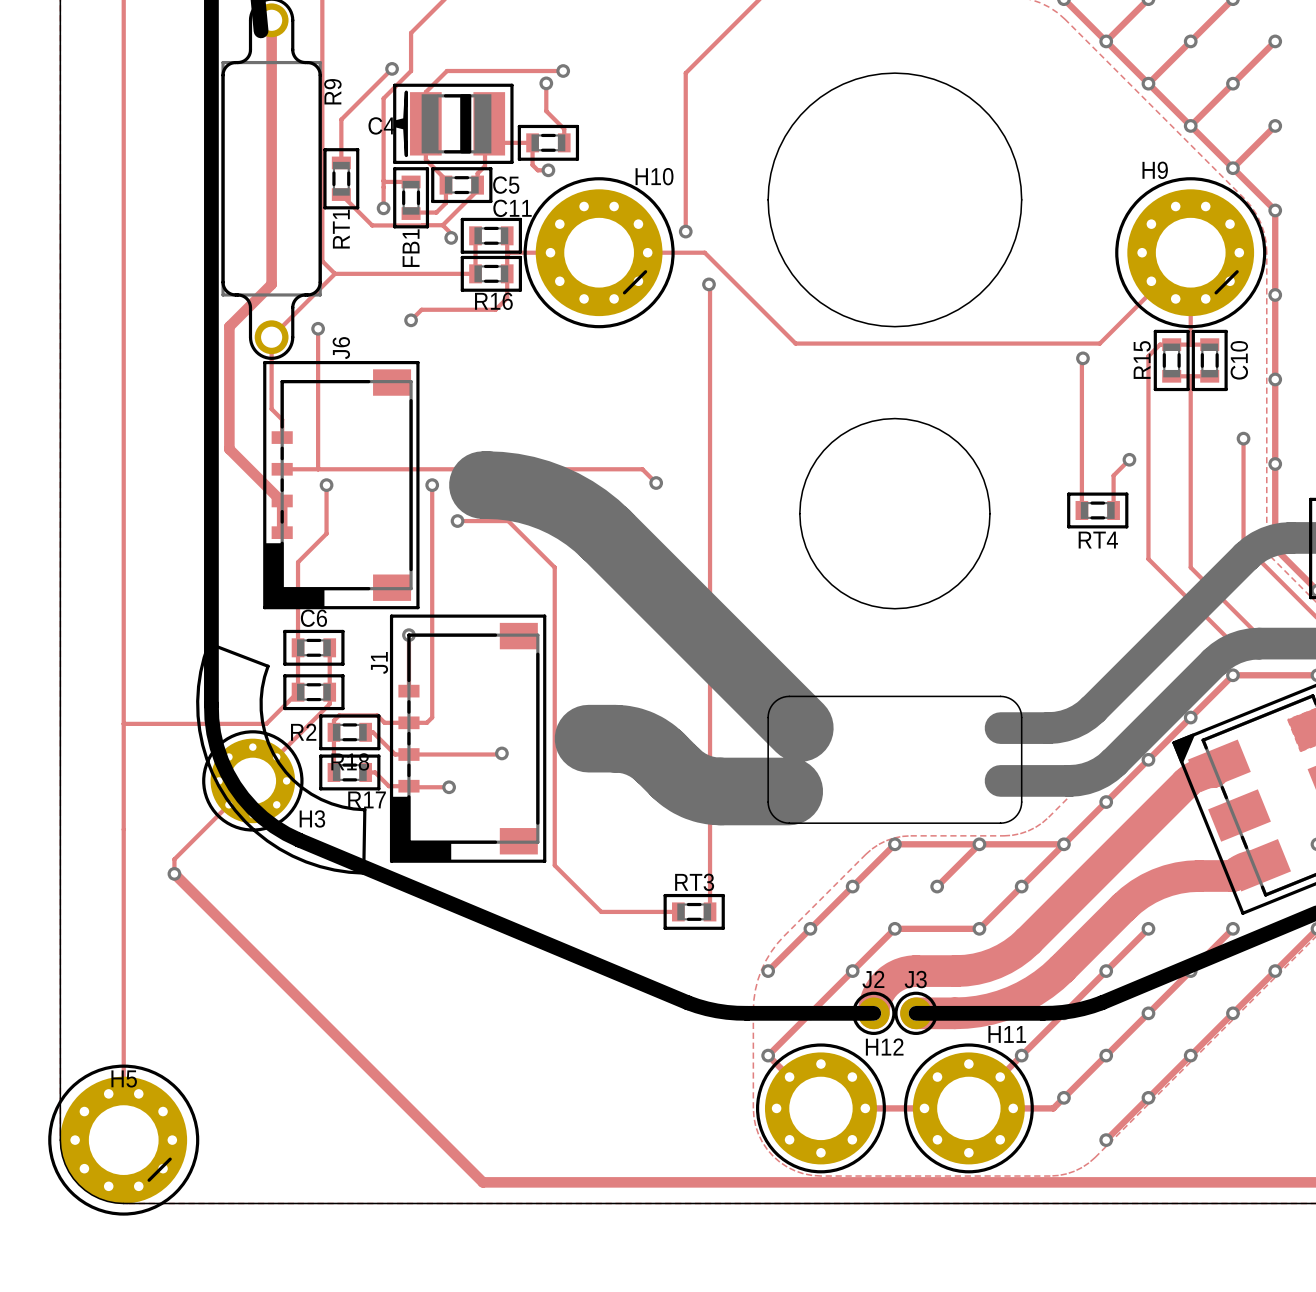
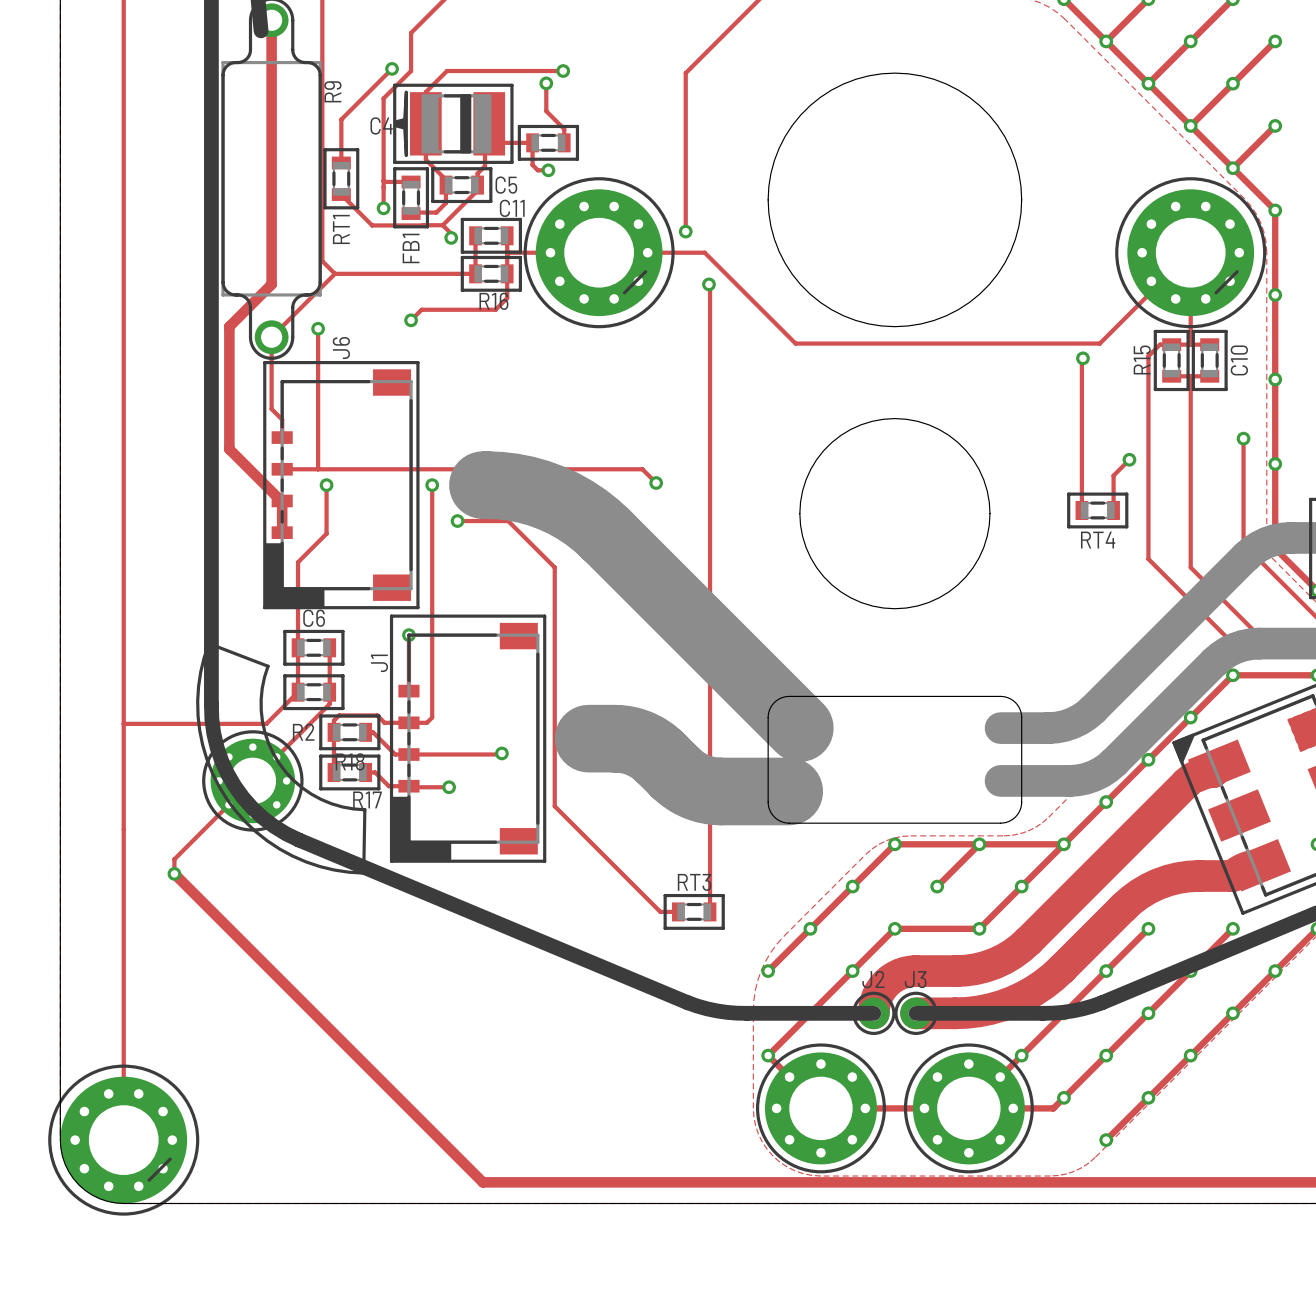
H9 name: H9 (1155, 170) -> none
H10 name: H10 (654, 176) -> none
track: (554, 806) (554, 865) (601, 911) (660, 911) -> (554, 806) (660, 911)
H3 name: H3 (312, 818) -> none
H11 name: H11 (1007, 1034) -> none
H12 name: H12 (884, 1047) -> none
H5 name: H5 (124, 1078) -> none

